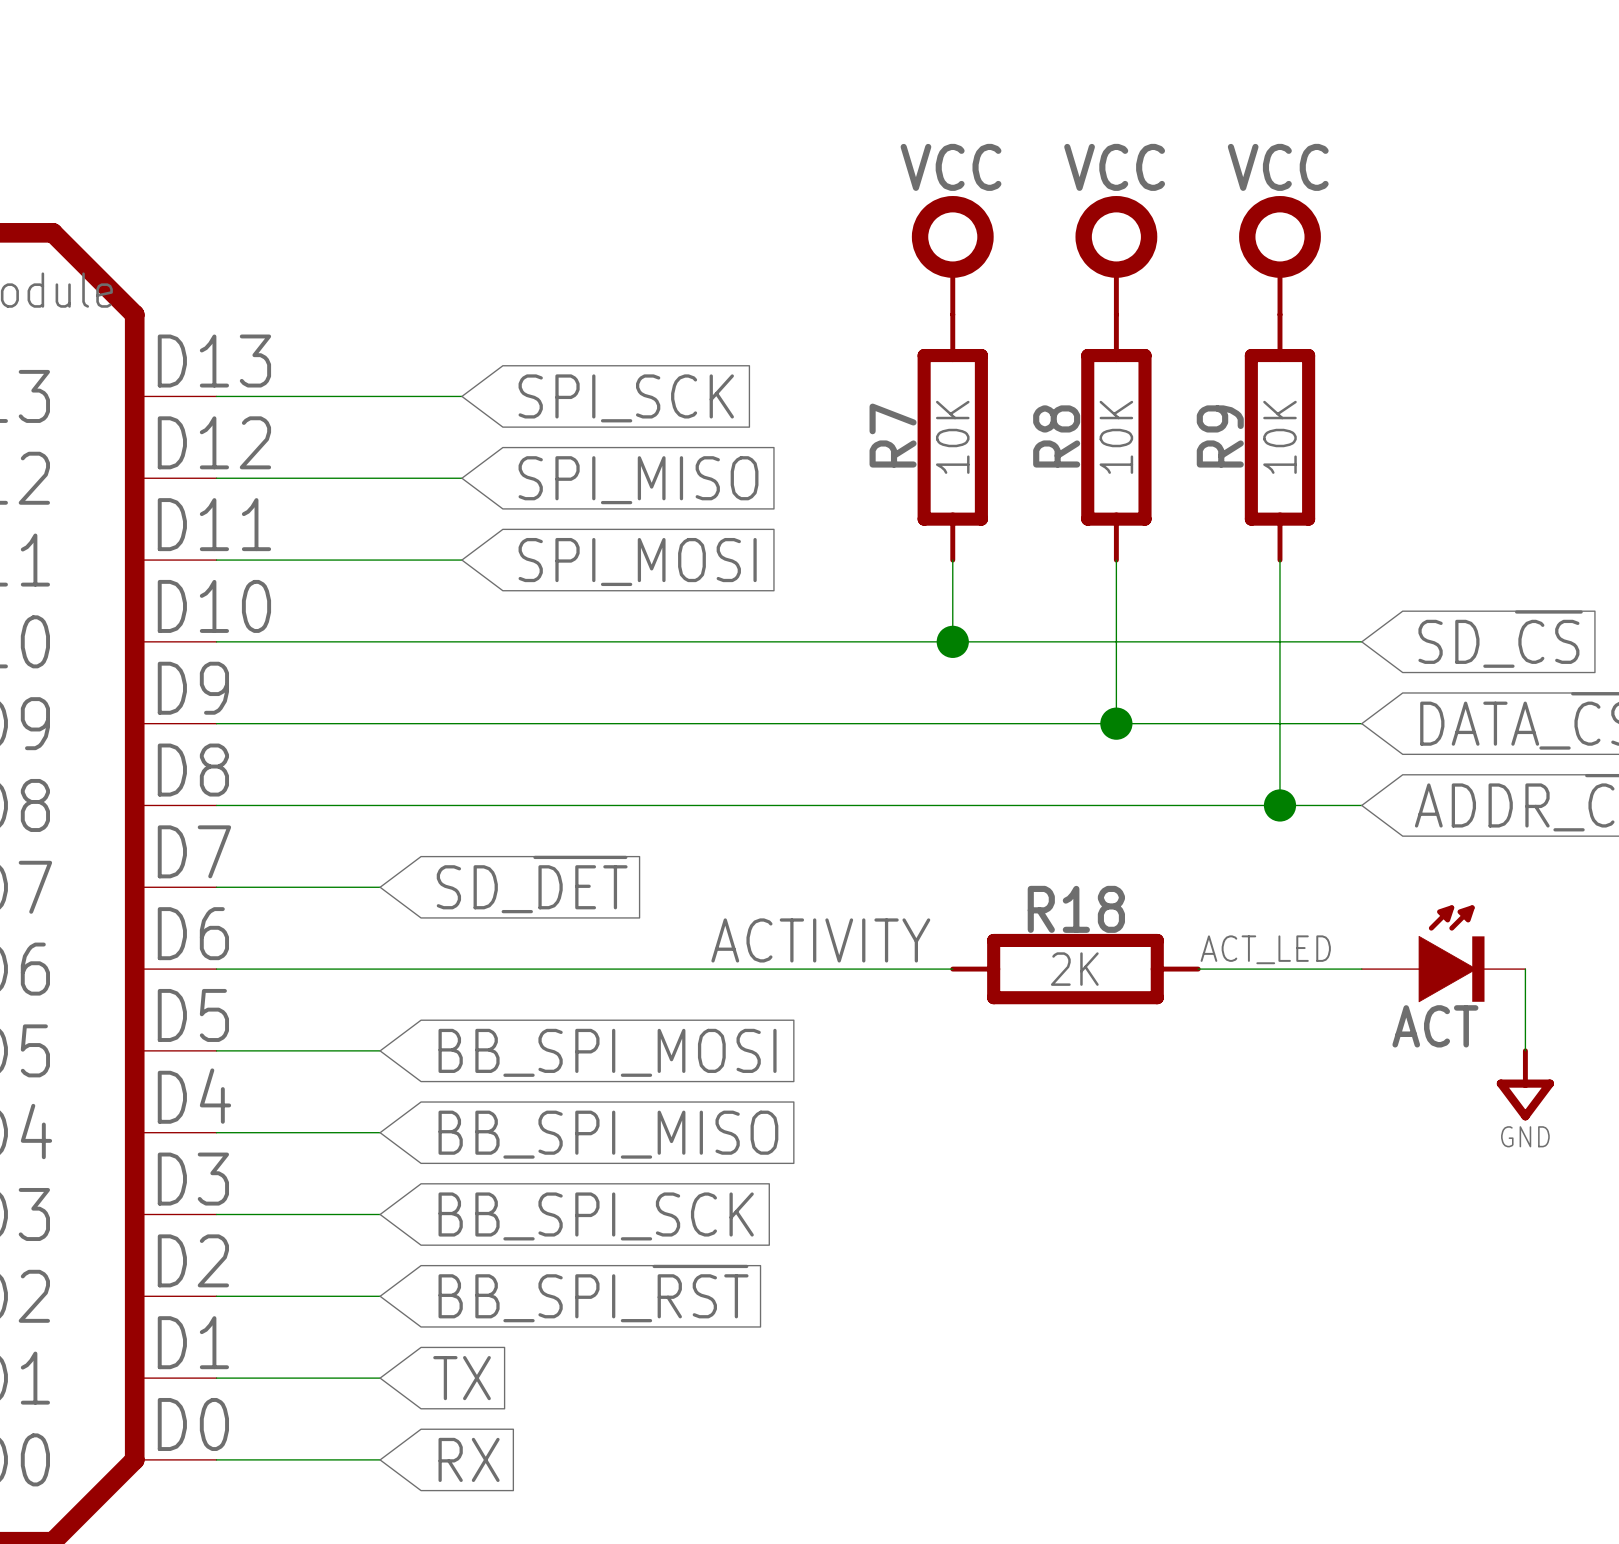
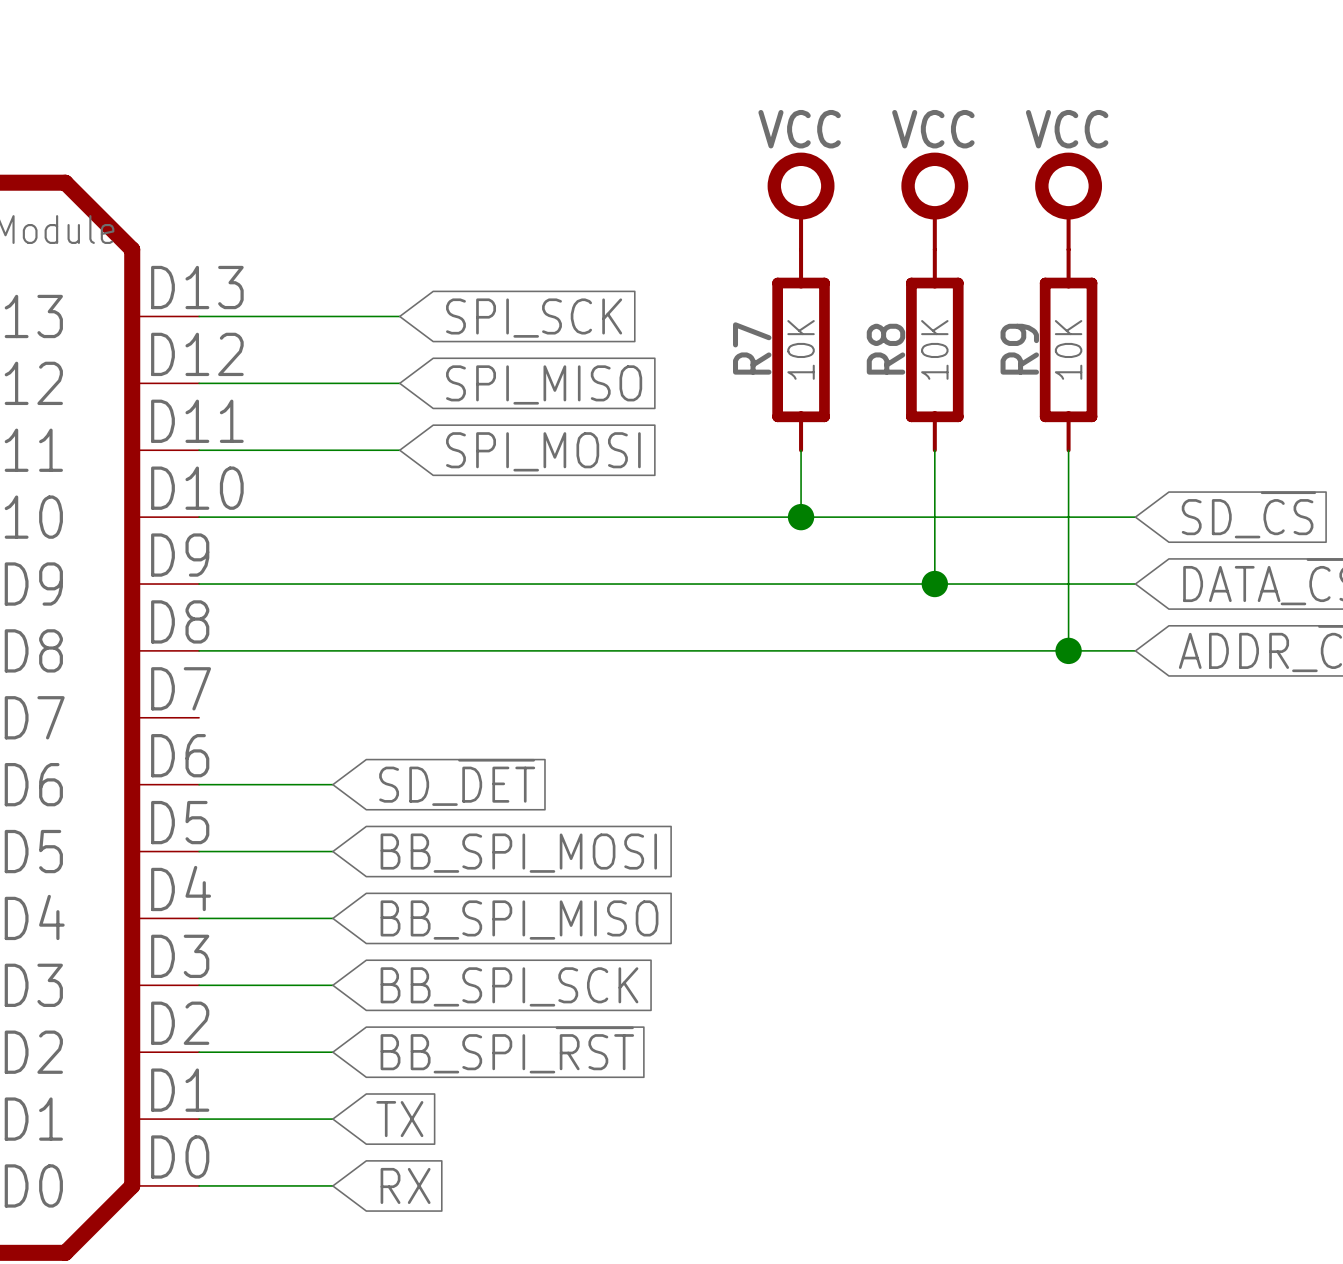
global label position: SD_~{DET} (532, 884) -> SD_~{DET} (457, 782)
wire: (216, 887) (380, 887) -> none
label: ACTIVITY (820, 940) -> none
label: ACT_LED (1265, 949) -> none
ACT: (1443, 953) -> none
wire: (380, 969) (952, 969) -> none
R18: 2K (1075, 969) -> none
wire: (1198, 969) (1361, 969) -> none
wire: (1525, 969) (1525, 1050) -> none
power symbol: GND (1525, 1084) -> none

